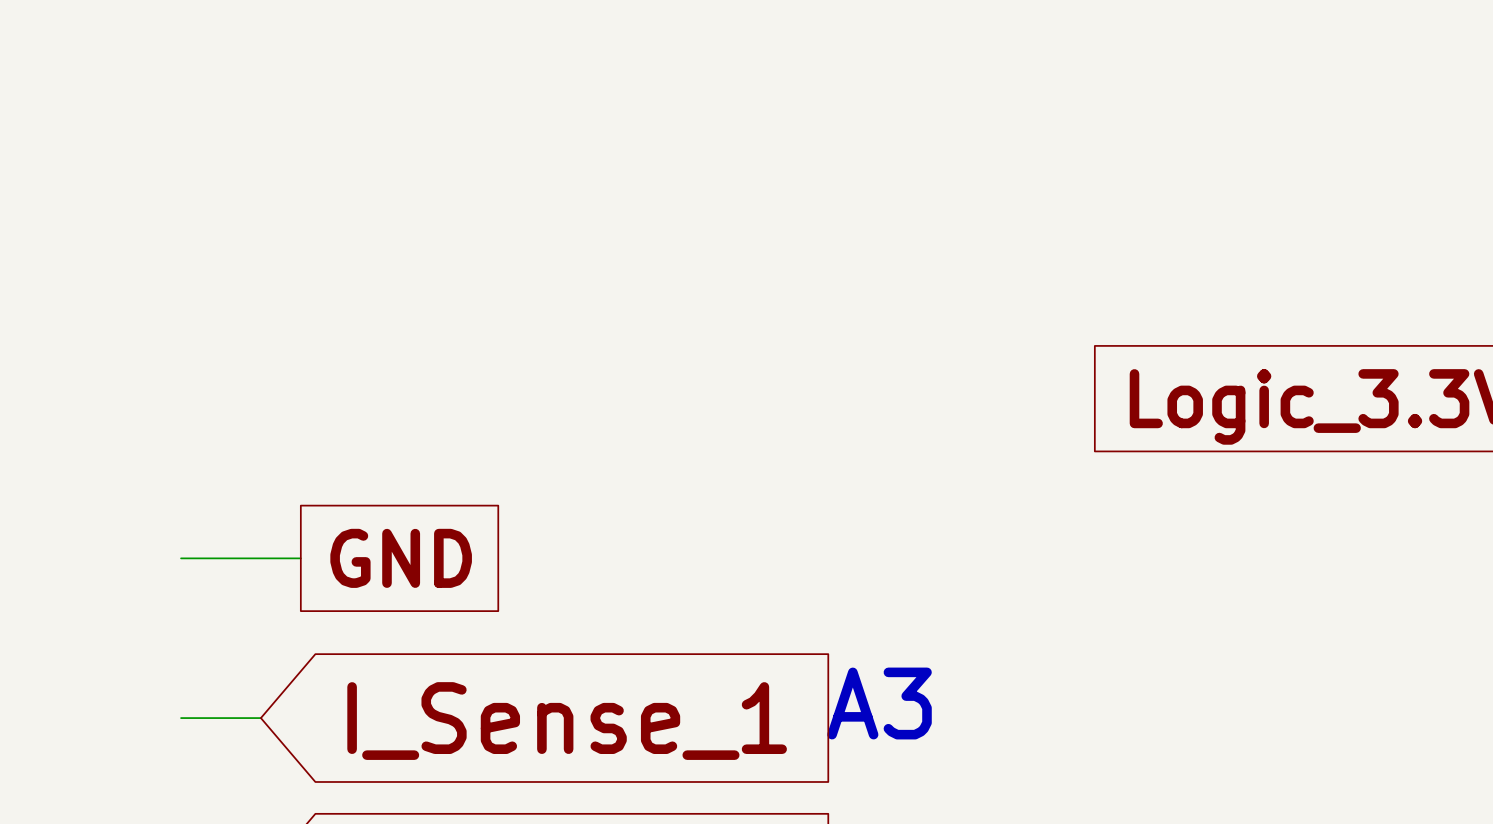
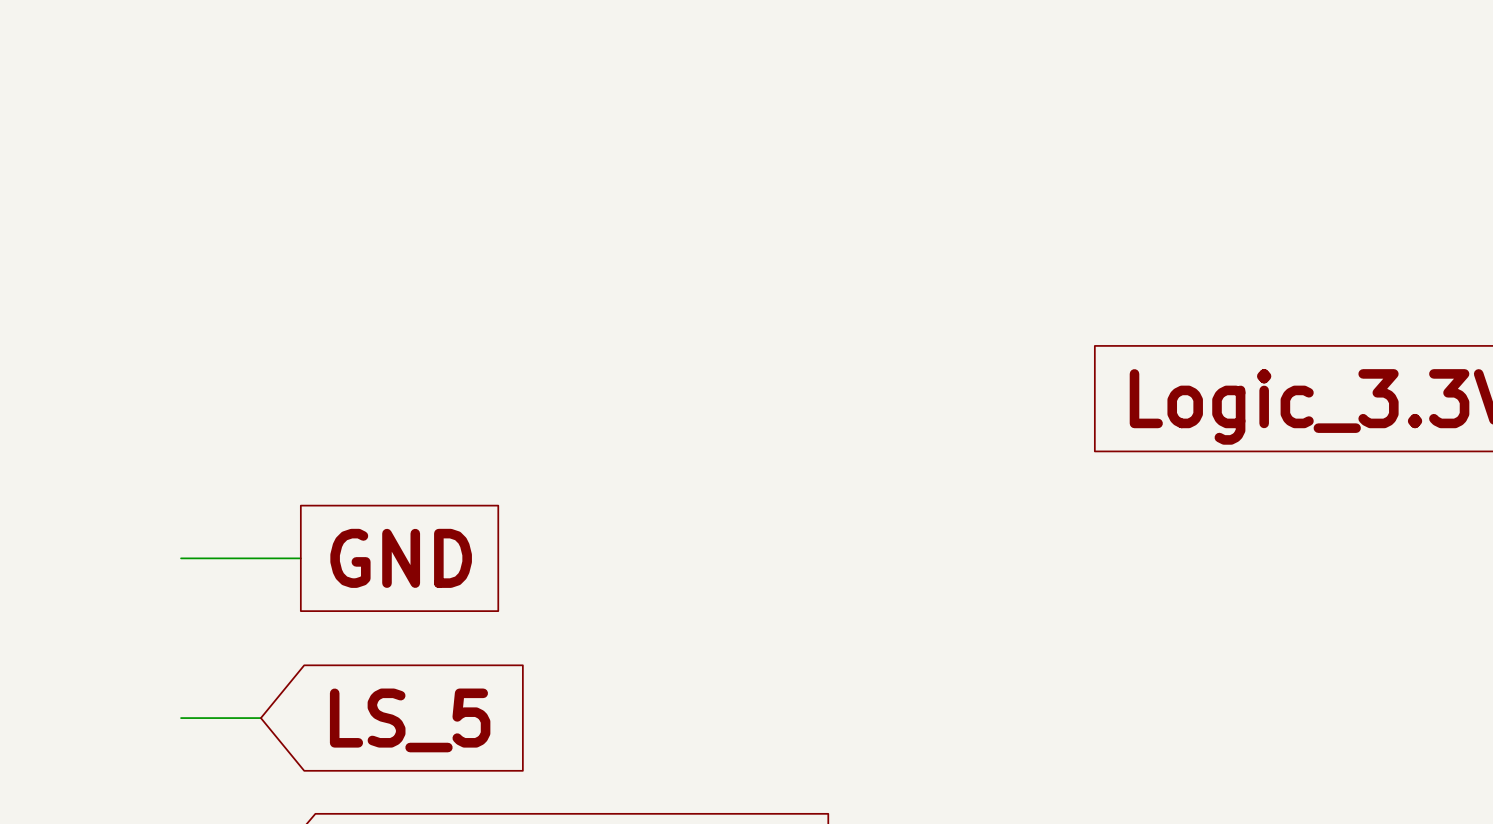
text: A3 (879, 703) -> none
global label: I_Sense_1 (567, 721) -> LS_5 (410, 720)

